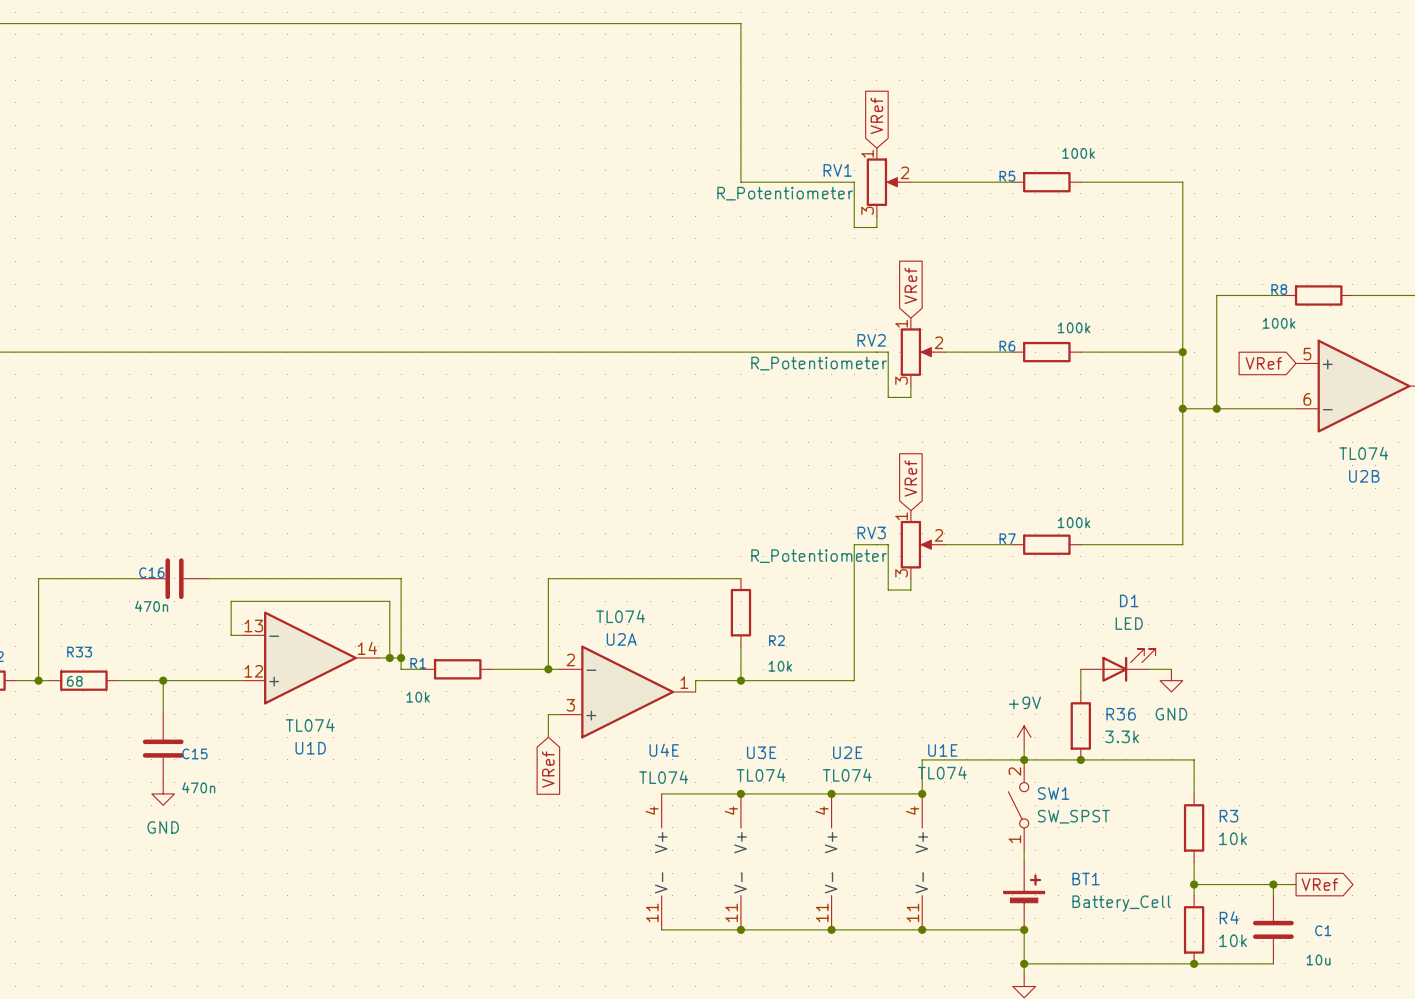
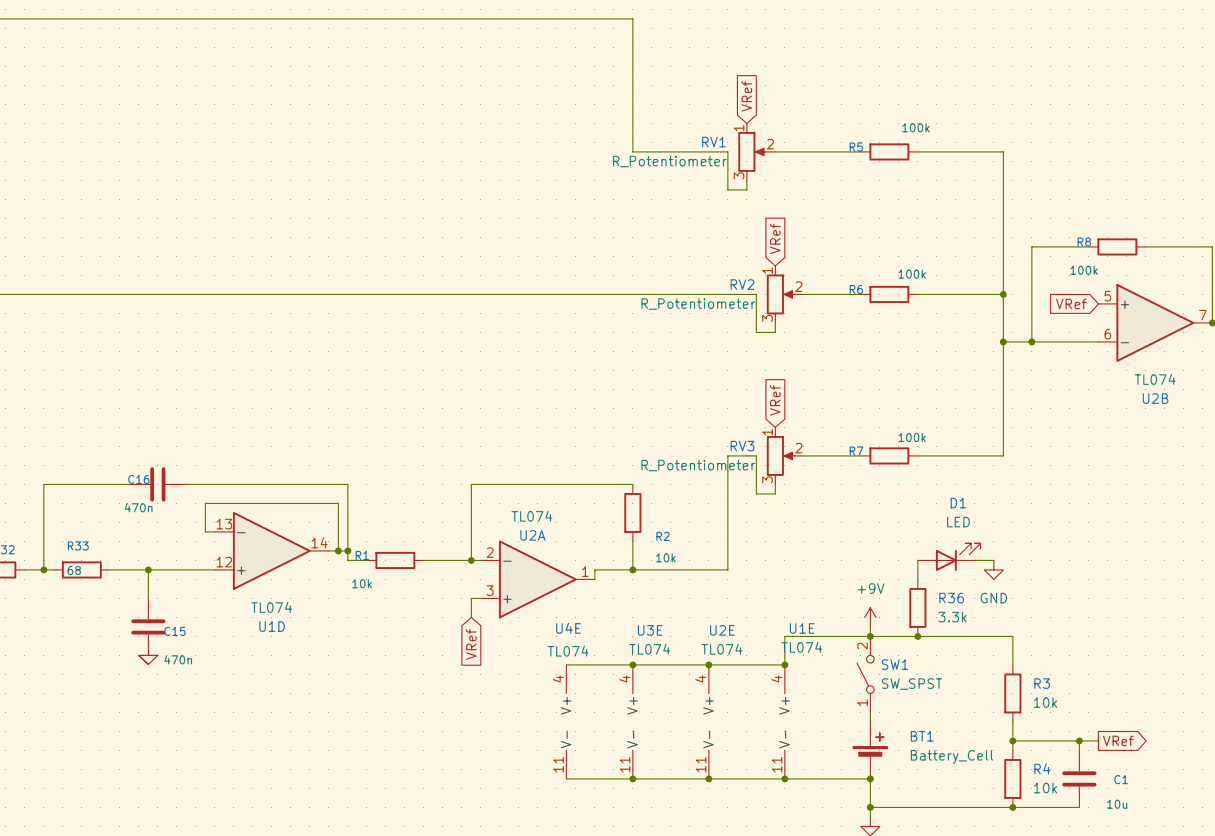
power symbol shape: [151, 782, 175, 806] -> [138, 654, 159, 665]
power symbol text: GND (163, 827) -> none

